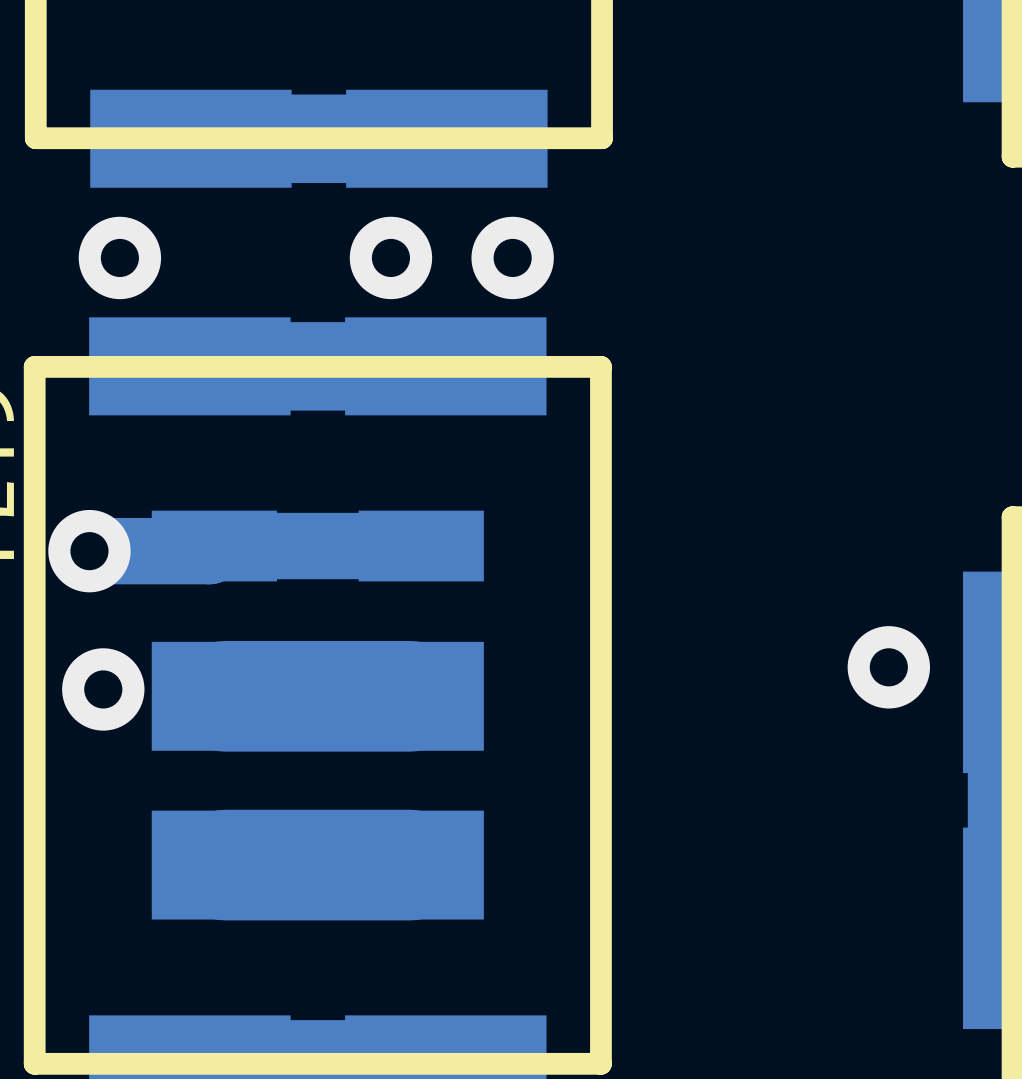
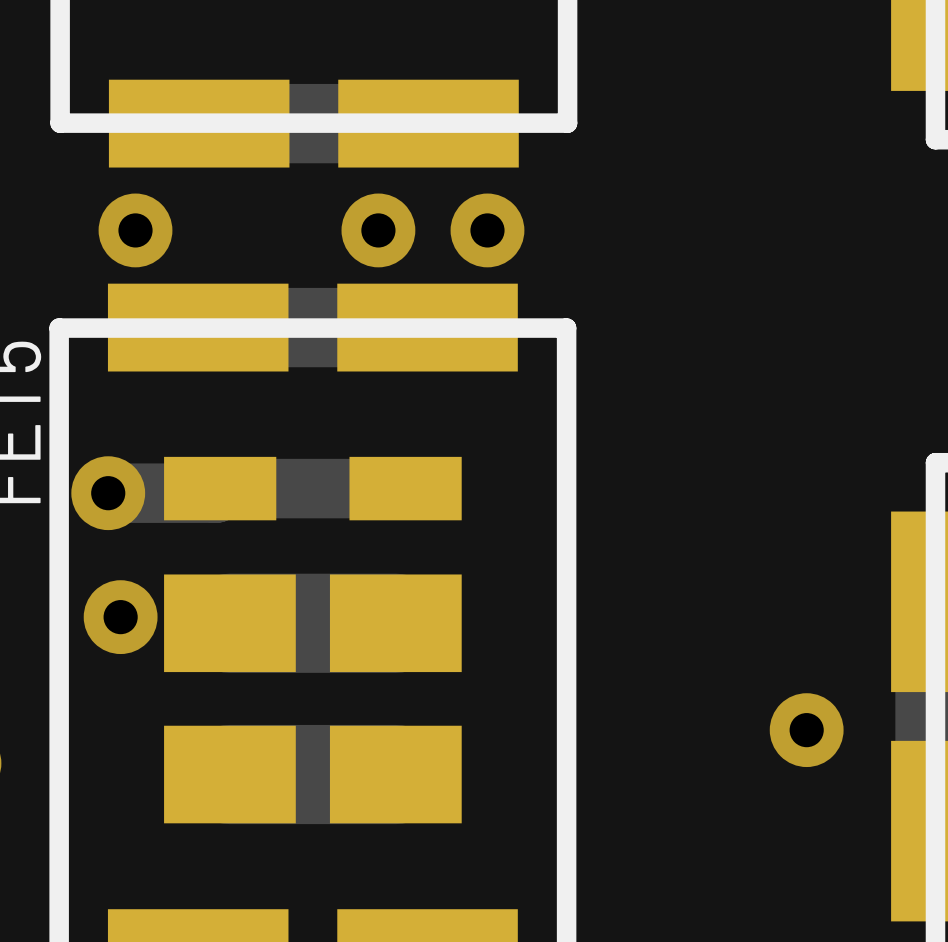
via position: (888, 667) -> (806, 730)

